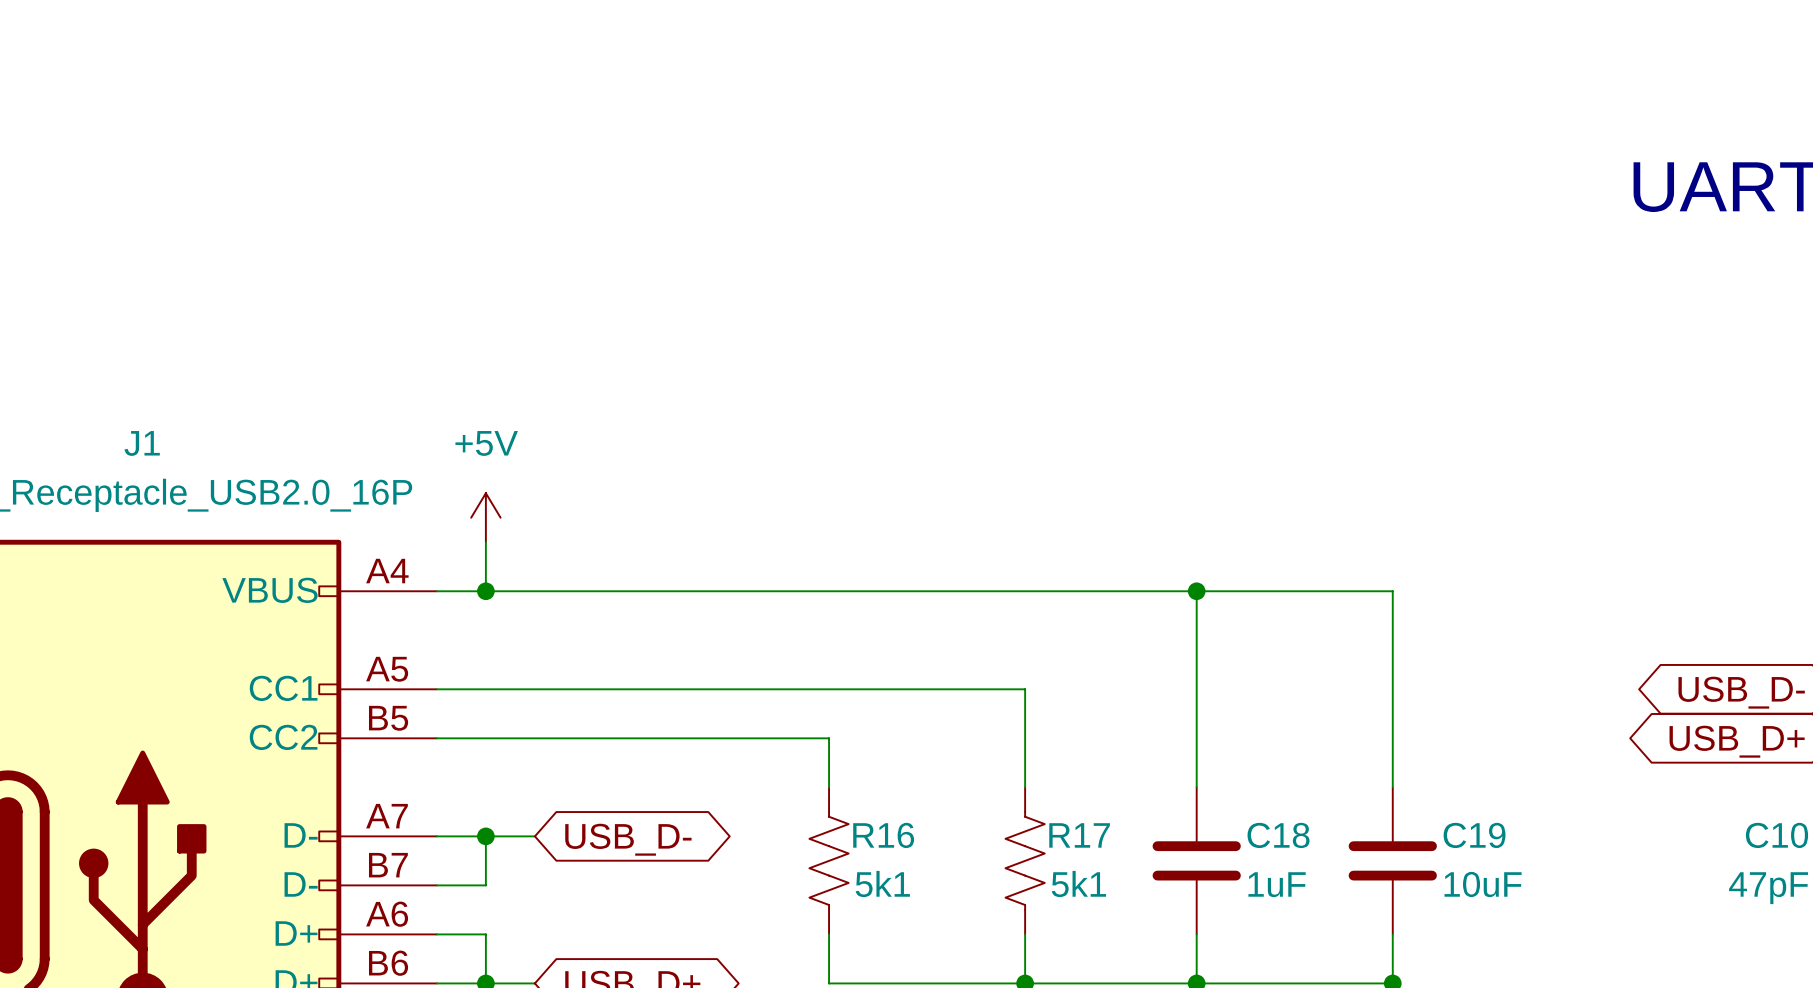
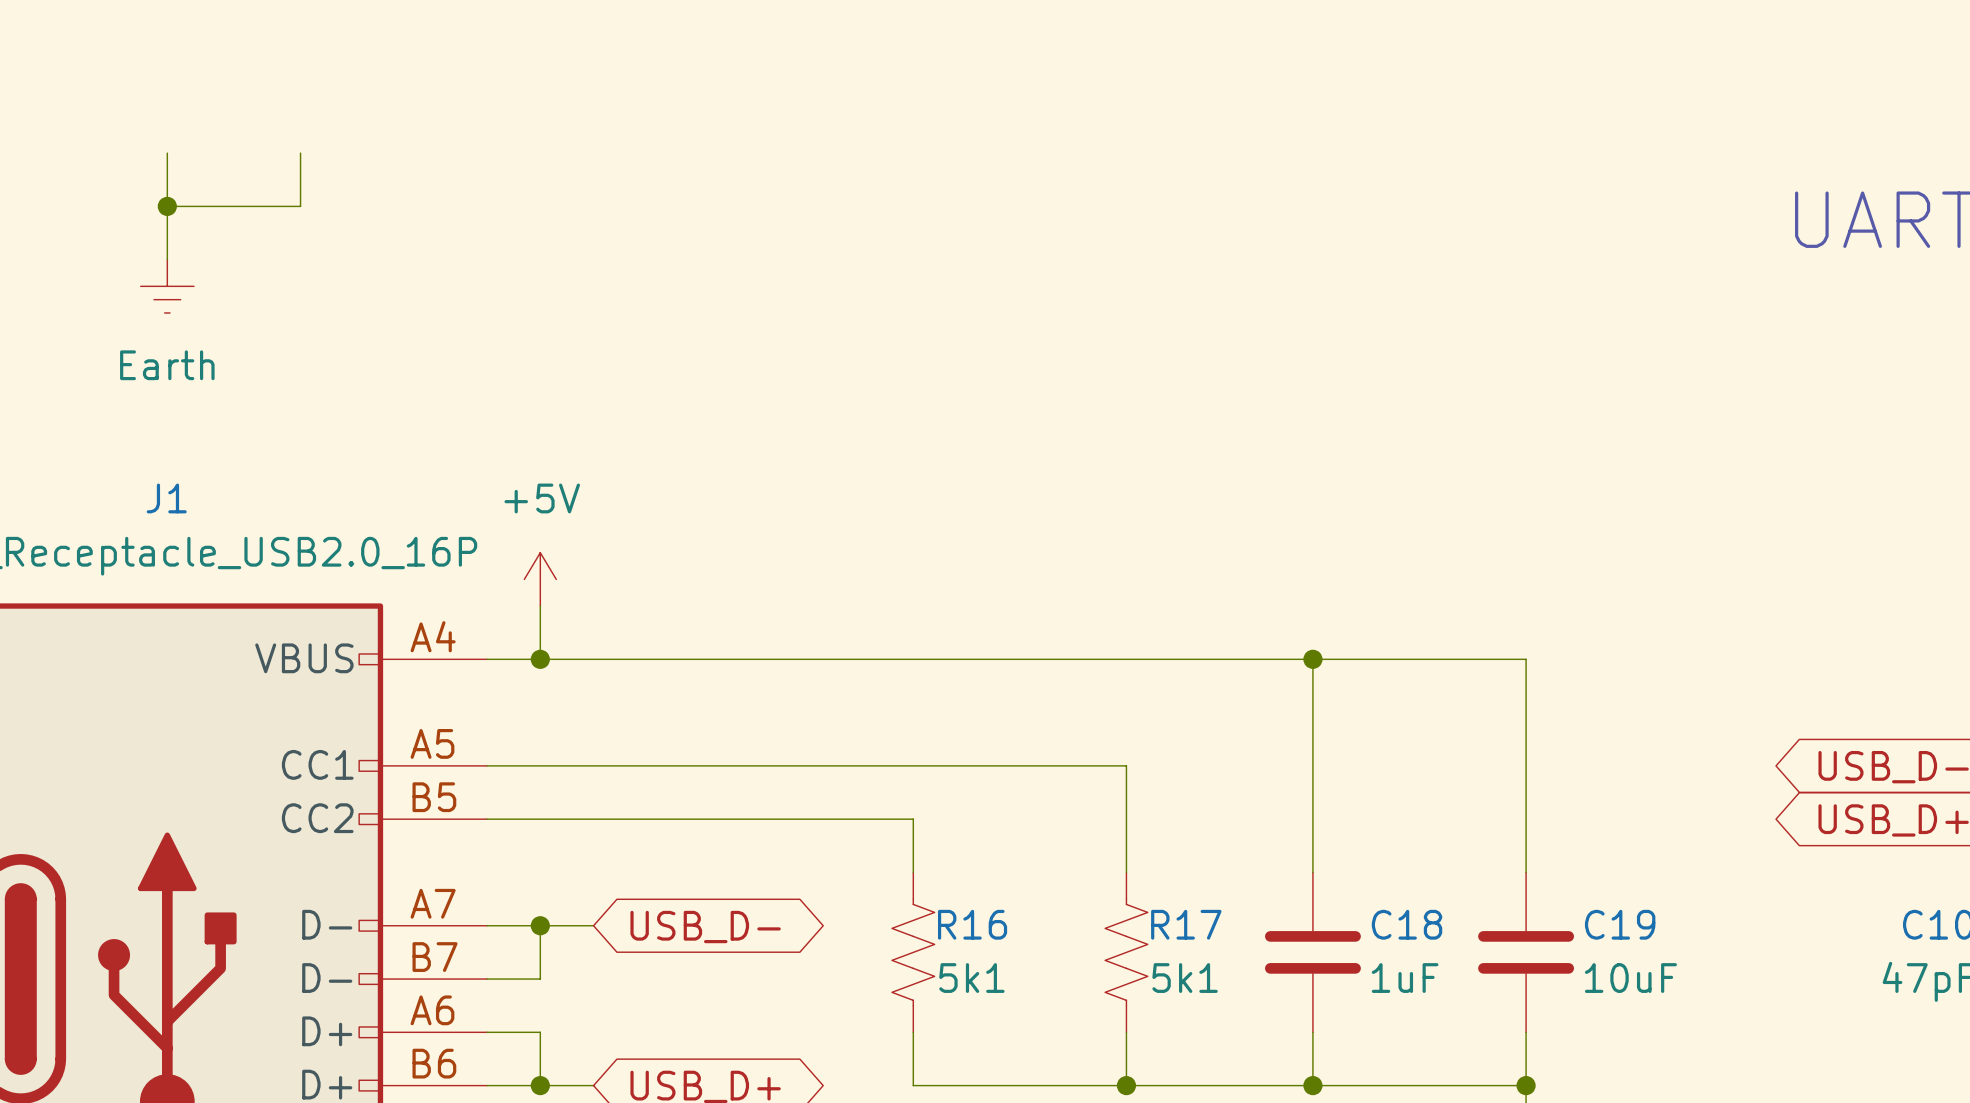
wire: none -> (167, 153) (167, 259)
wire: none -> (300, 153) (300, 206) (167, 206)
junction: none -> (167, 206)
power symbol: none -> Earth (167, 286)

